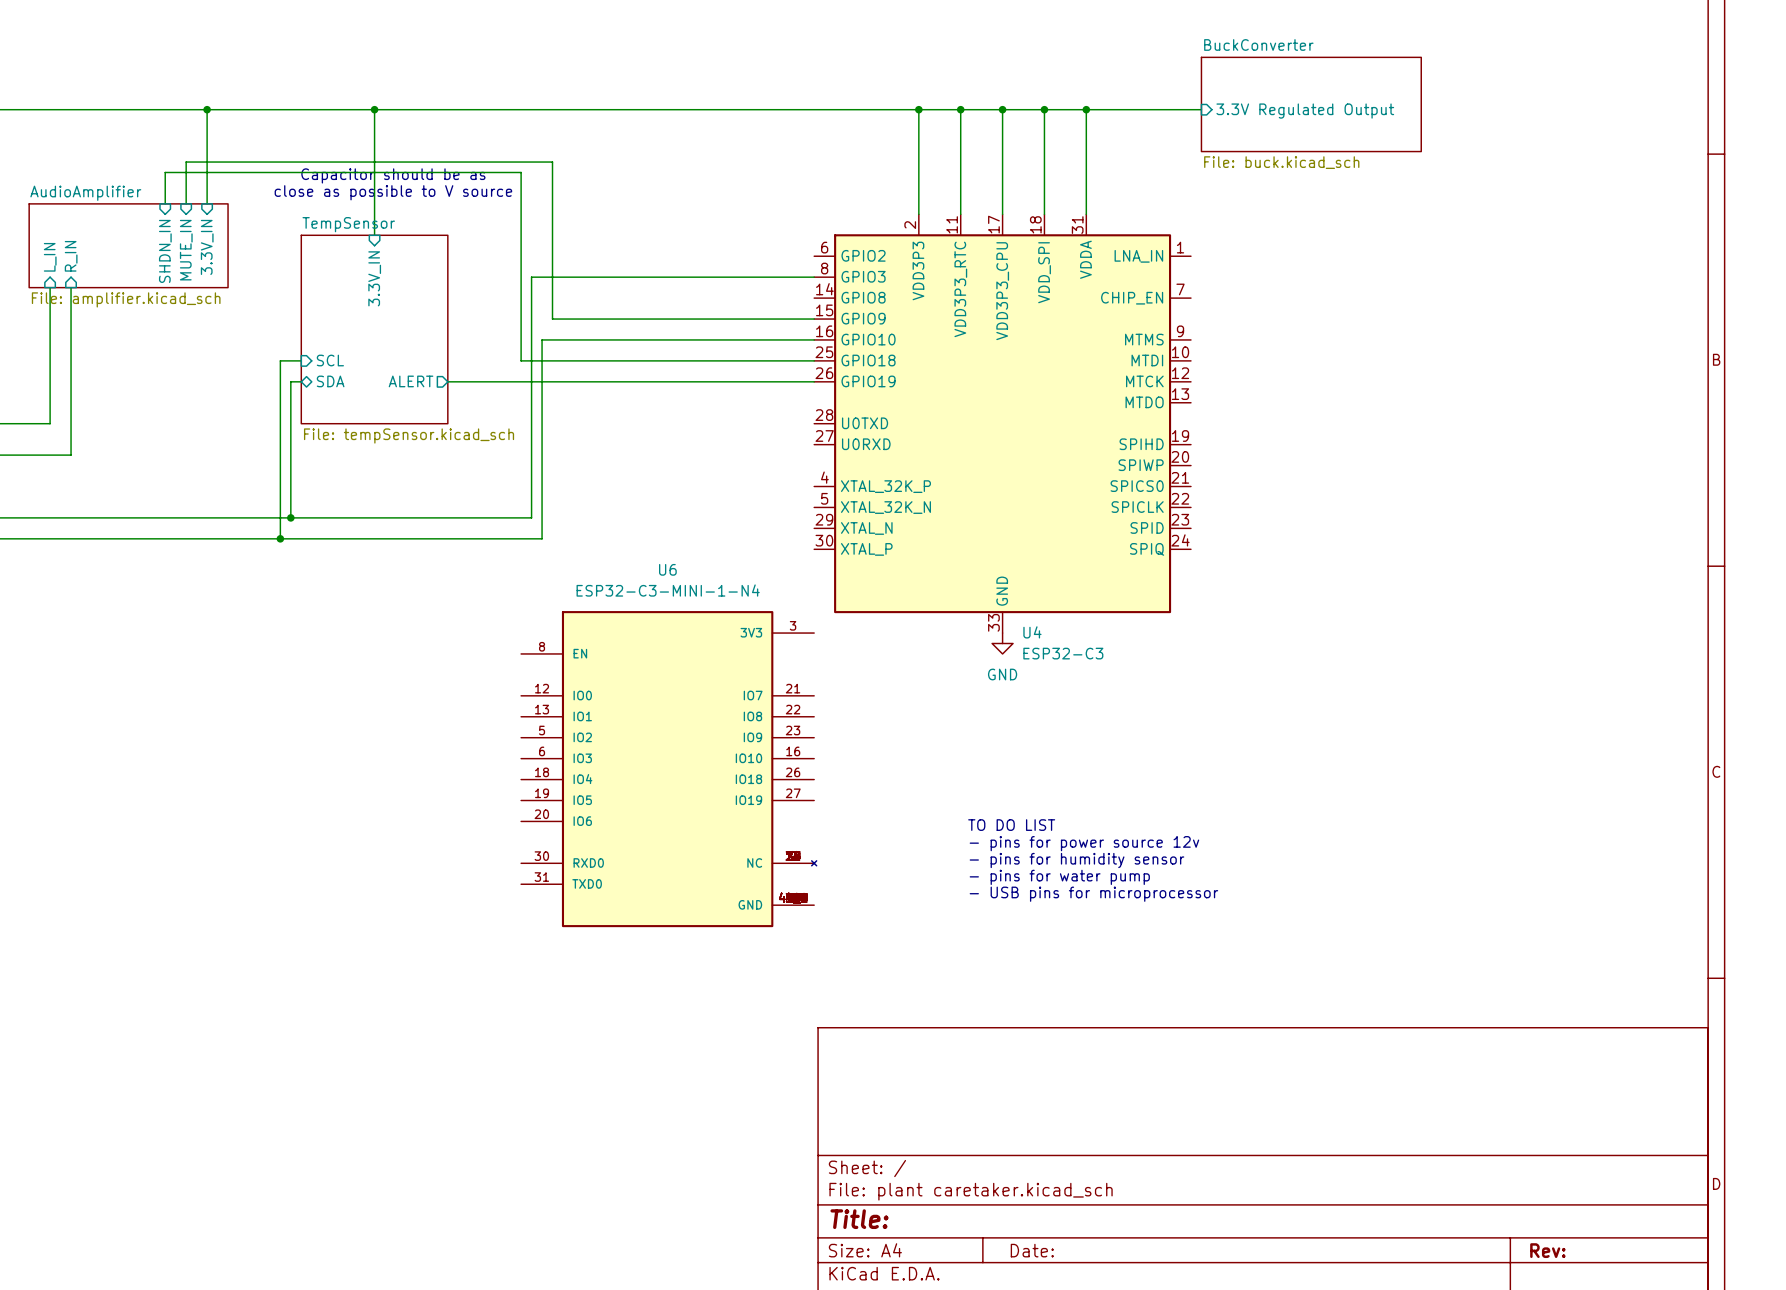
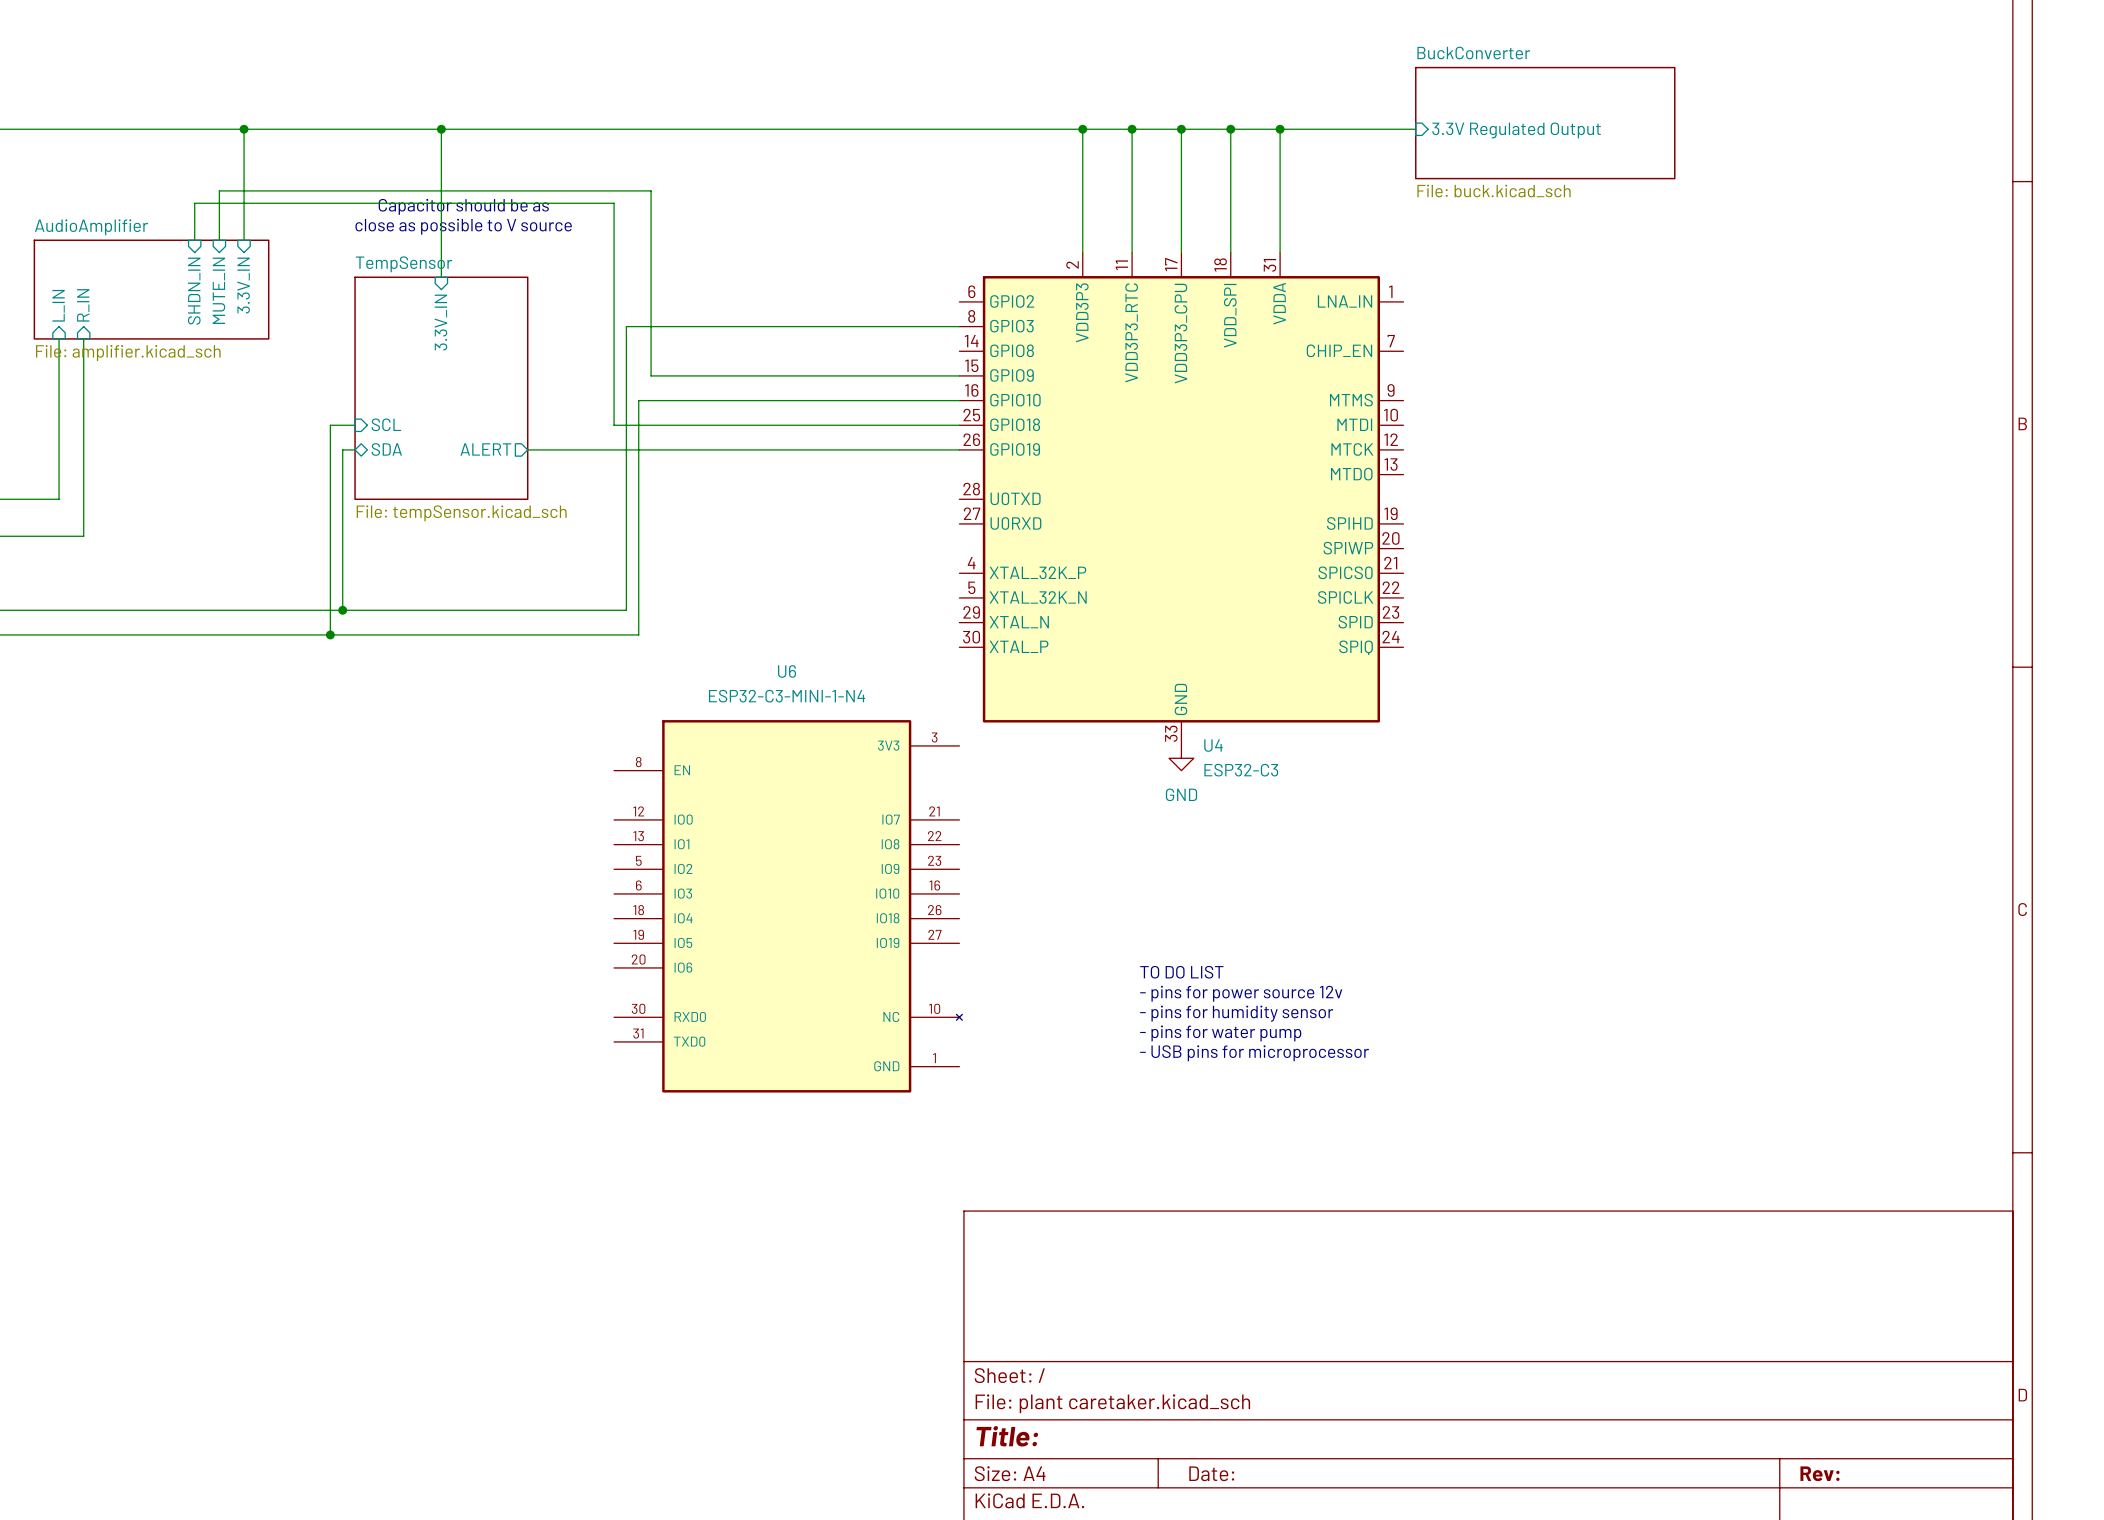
U6 symbol: [521, 611, 817, 928] -> [614, 720, 963, 1093]

